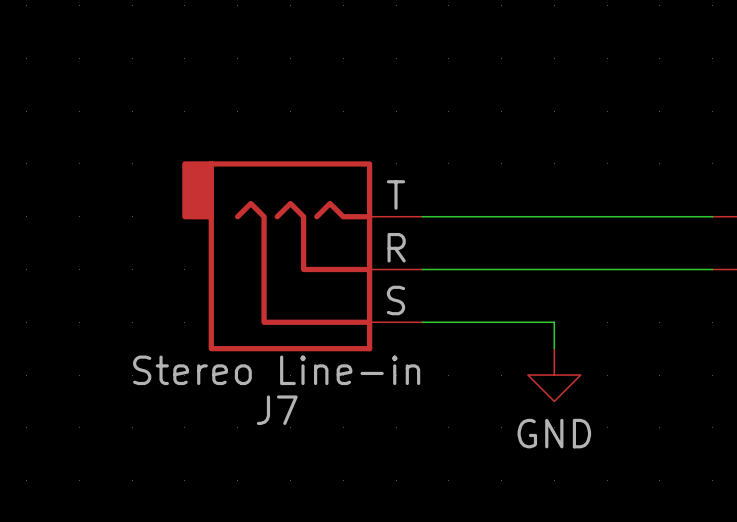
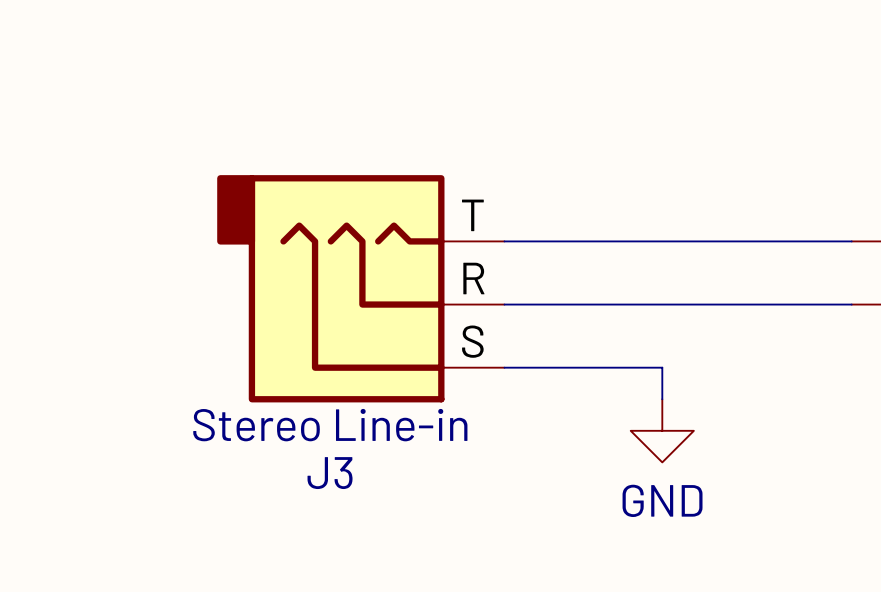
J7 name: J7 (277, 410) -> J3 (330, 473)

